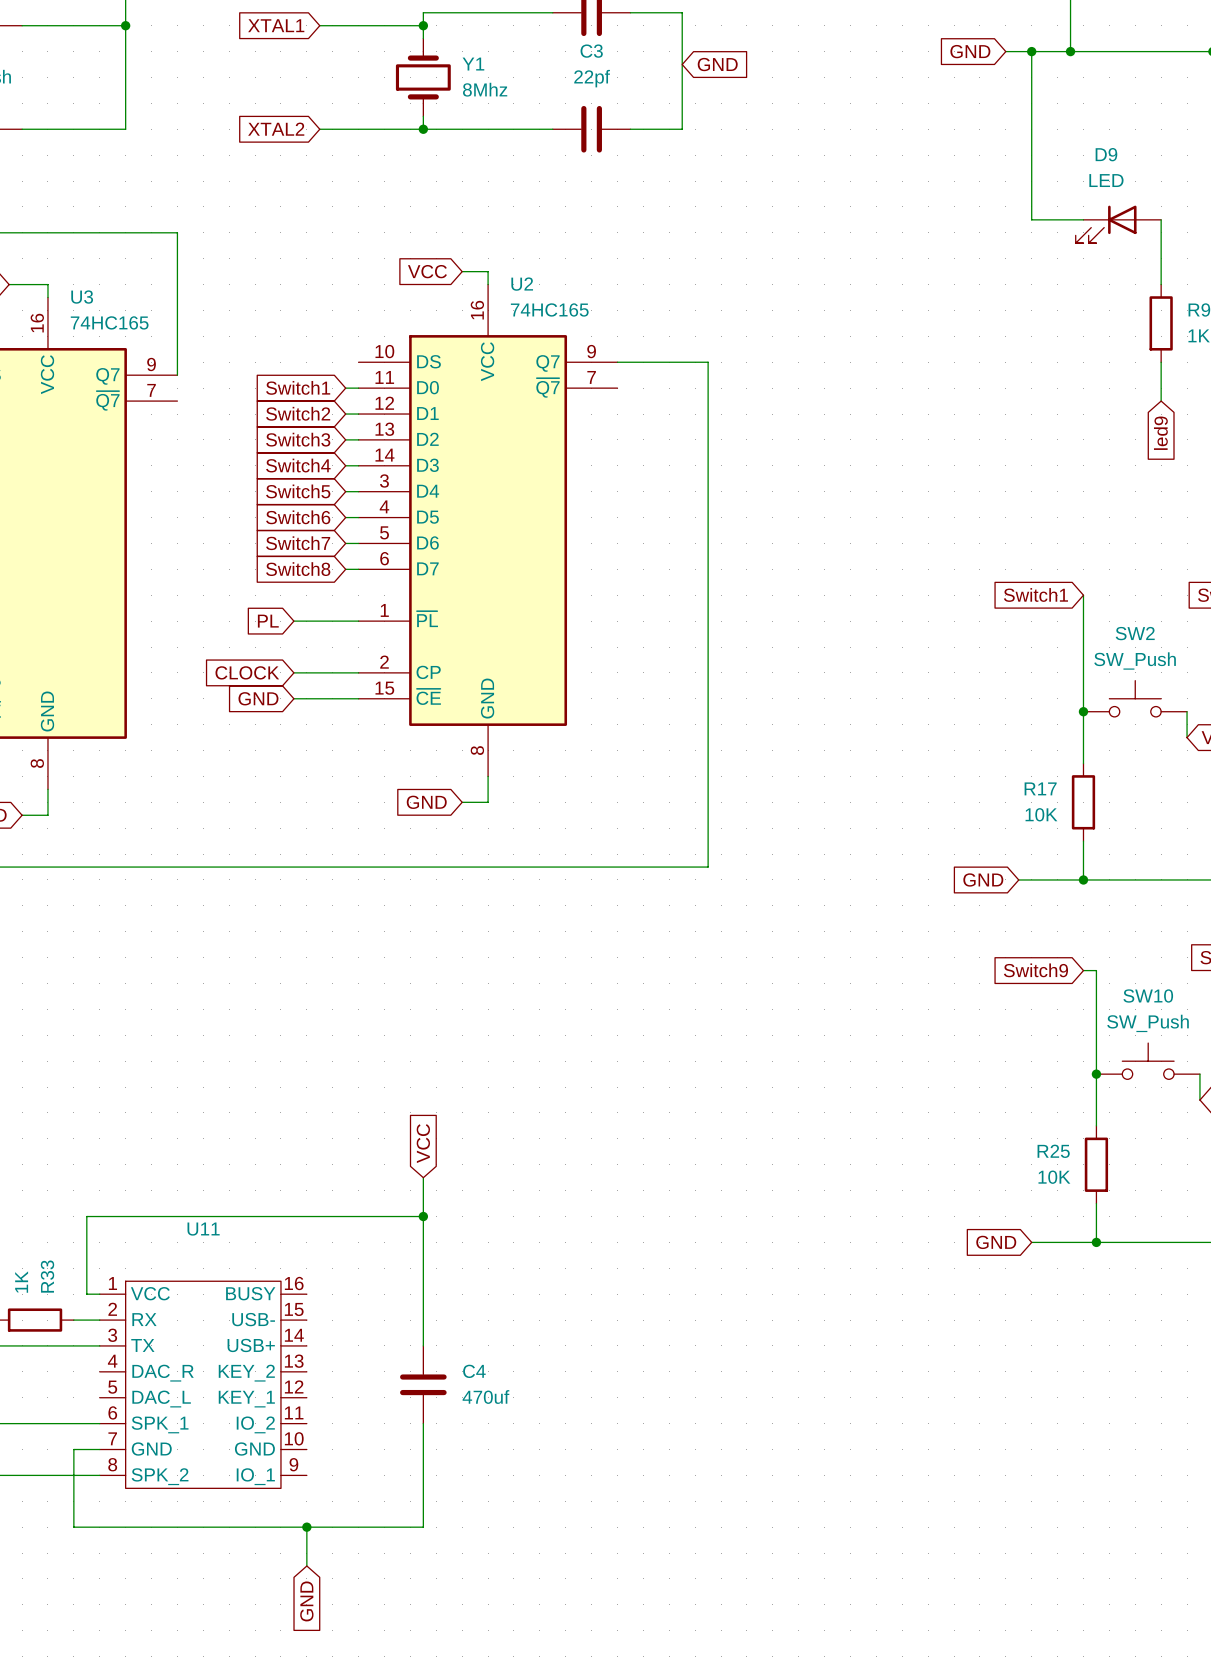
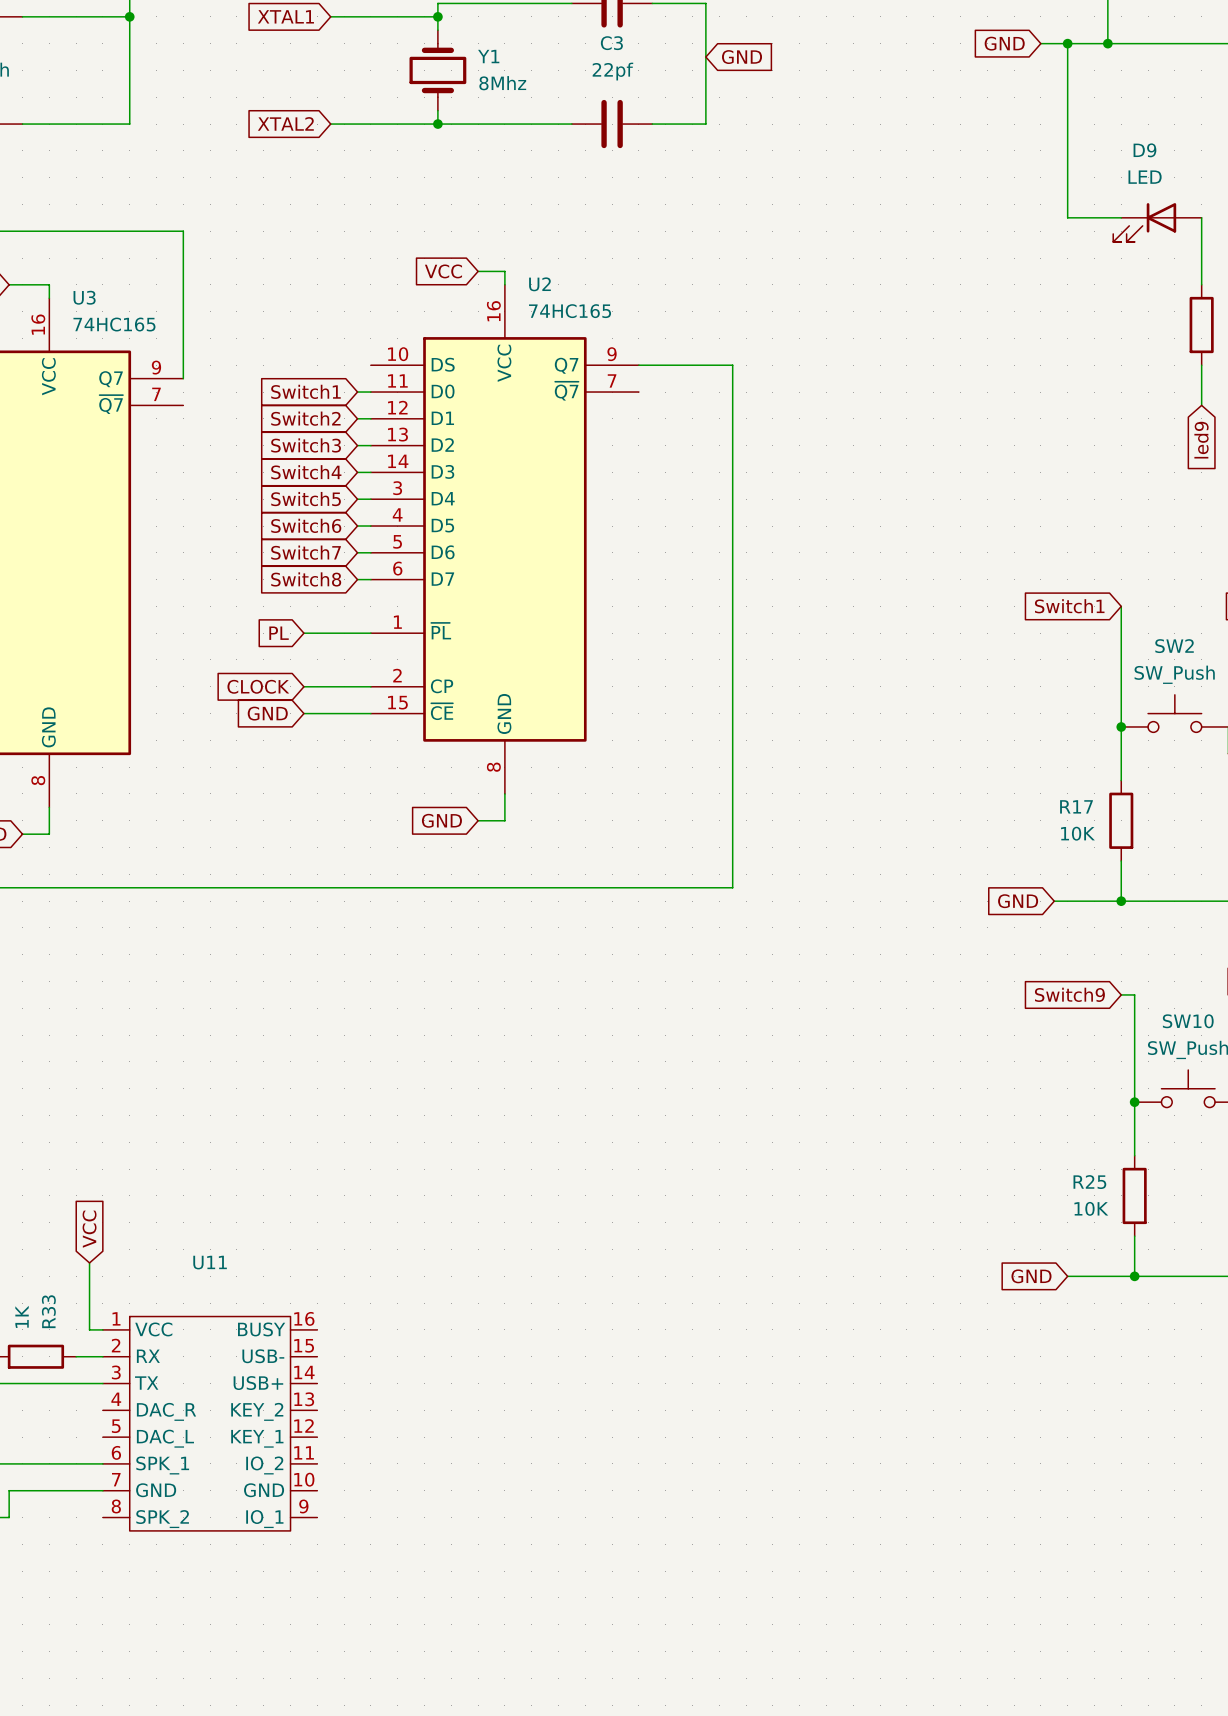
global label: VCC (423, 1143) -> none
wire: (423, 1177) (423, 1345) -> none
global label: none -> VCC (89, 1229)
wire: (423, 1216) (86, 1216) (86, 1229) -> none
junction: (423, 1216) -> none
C4: 470uf (423, 1384) -> none
wire: (423, 1423) (423, 1527) (73, 1527) (73, 1449) -> none
wire: (9, 1475) (99, 1475) -> (9, 1517) (9, 1490) (76, 1490)
wire: (306, 1527) (306, 1566) -> none
junction: (306, 1527) -> none
global label: GND (306, 1601) -> none

